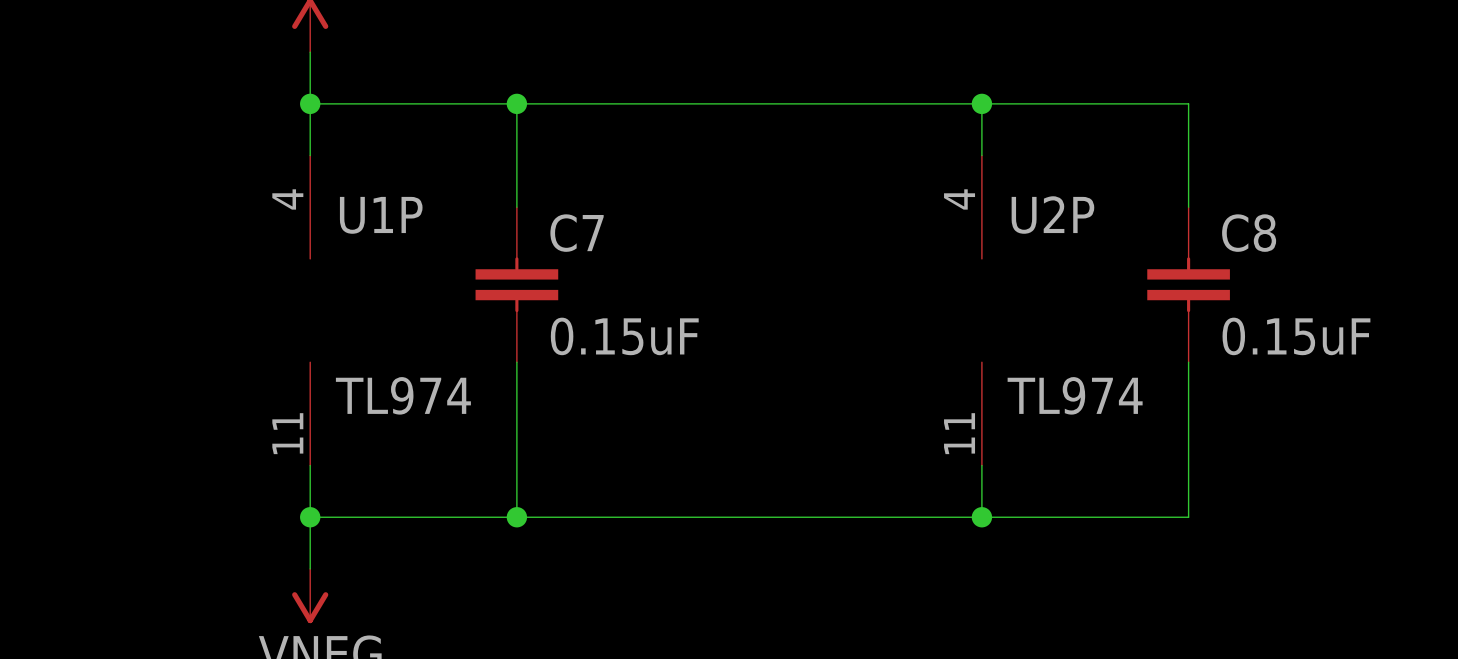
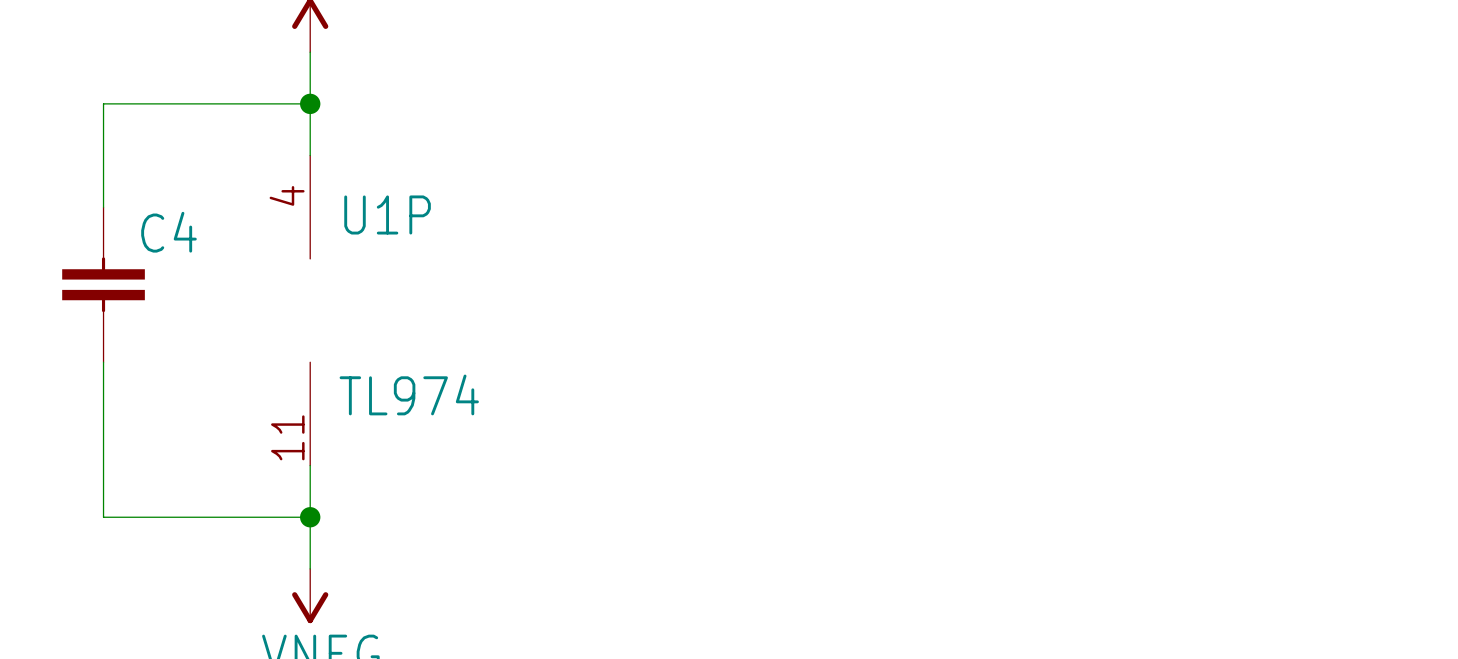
wire: (310, 103) (1188, 103) (1188, 207) -> (310, 103) (103, 103) (103, 207)
wire: (516, 103) (516, 207) -> none
junction: (516, 103) -> none
wire: (981, 103) (981, 155) -> none
junction: (981, 103) -> none
C4: none -> (103, 284)
C7: 0.15uF (516, 284) -> none
C8: 0.15uF (1188, 284) -> none
U2P: TL974 (981, 310) -> none
wire: (516, 362) (516, 517) -> none
wire: (1188, 362) (1188, 517) (310, 517) -> (103, 362) (103, 517) (310, 517)
wire: (981, 465) (981, 517) -> none
junction: (516, 517) -> none
junction: (981, 517) -> none

